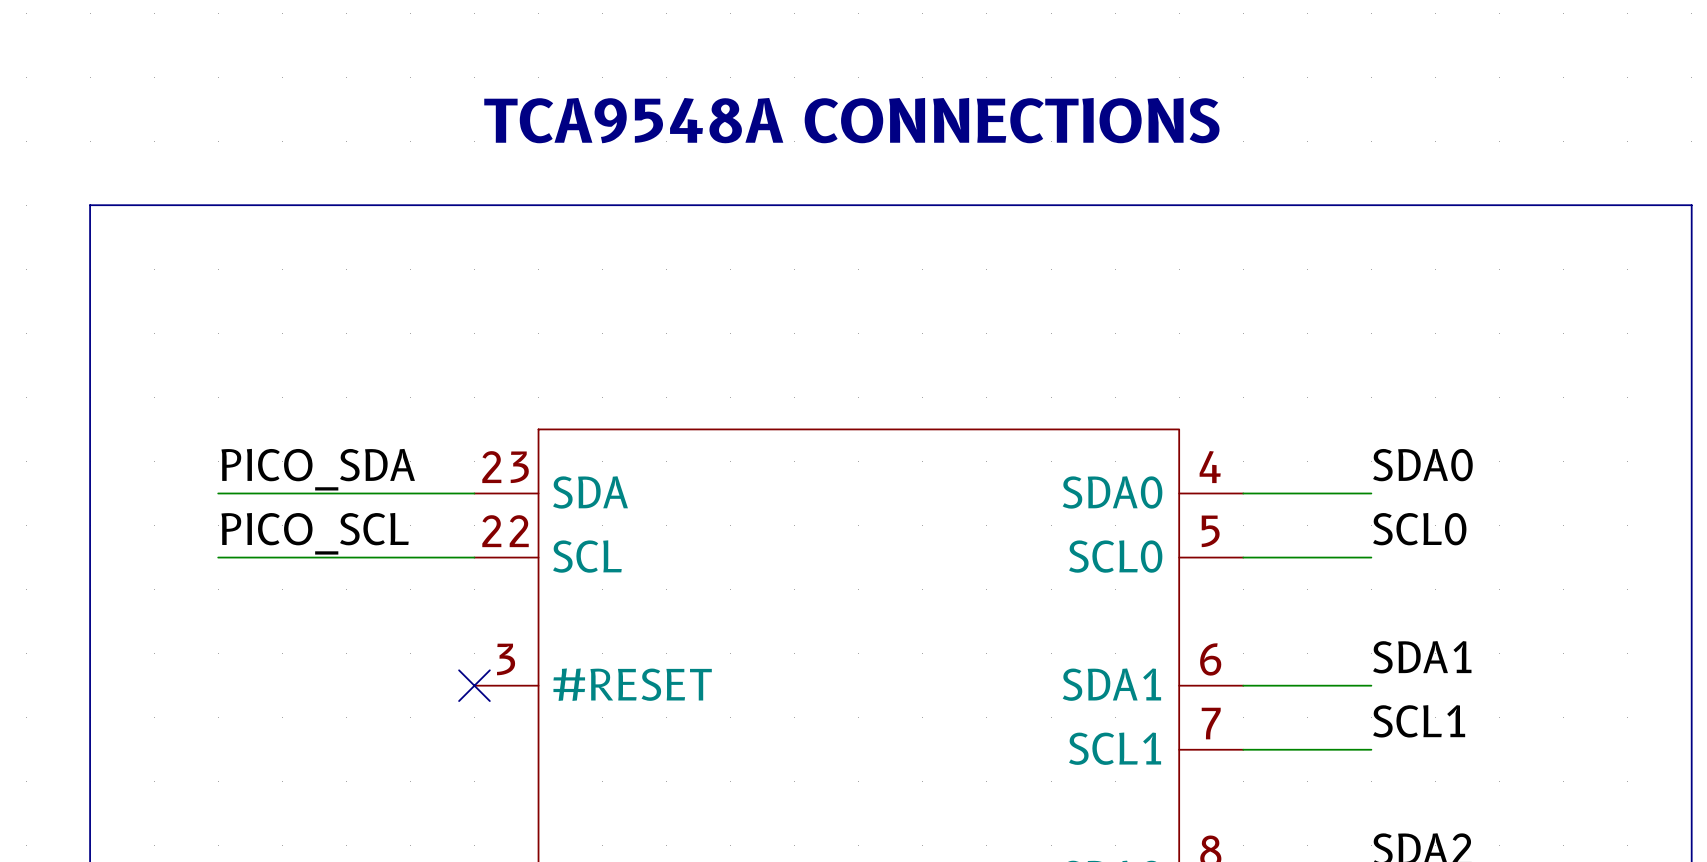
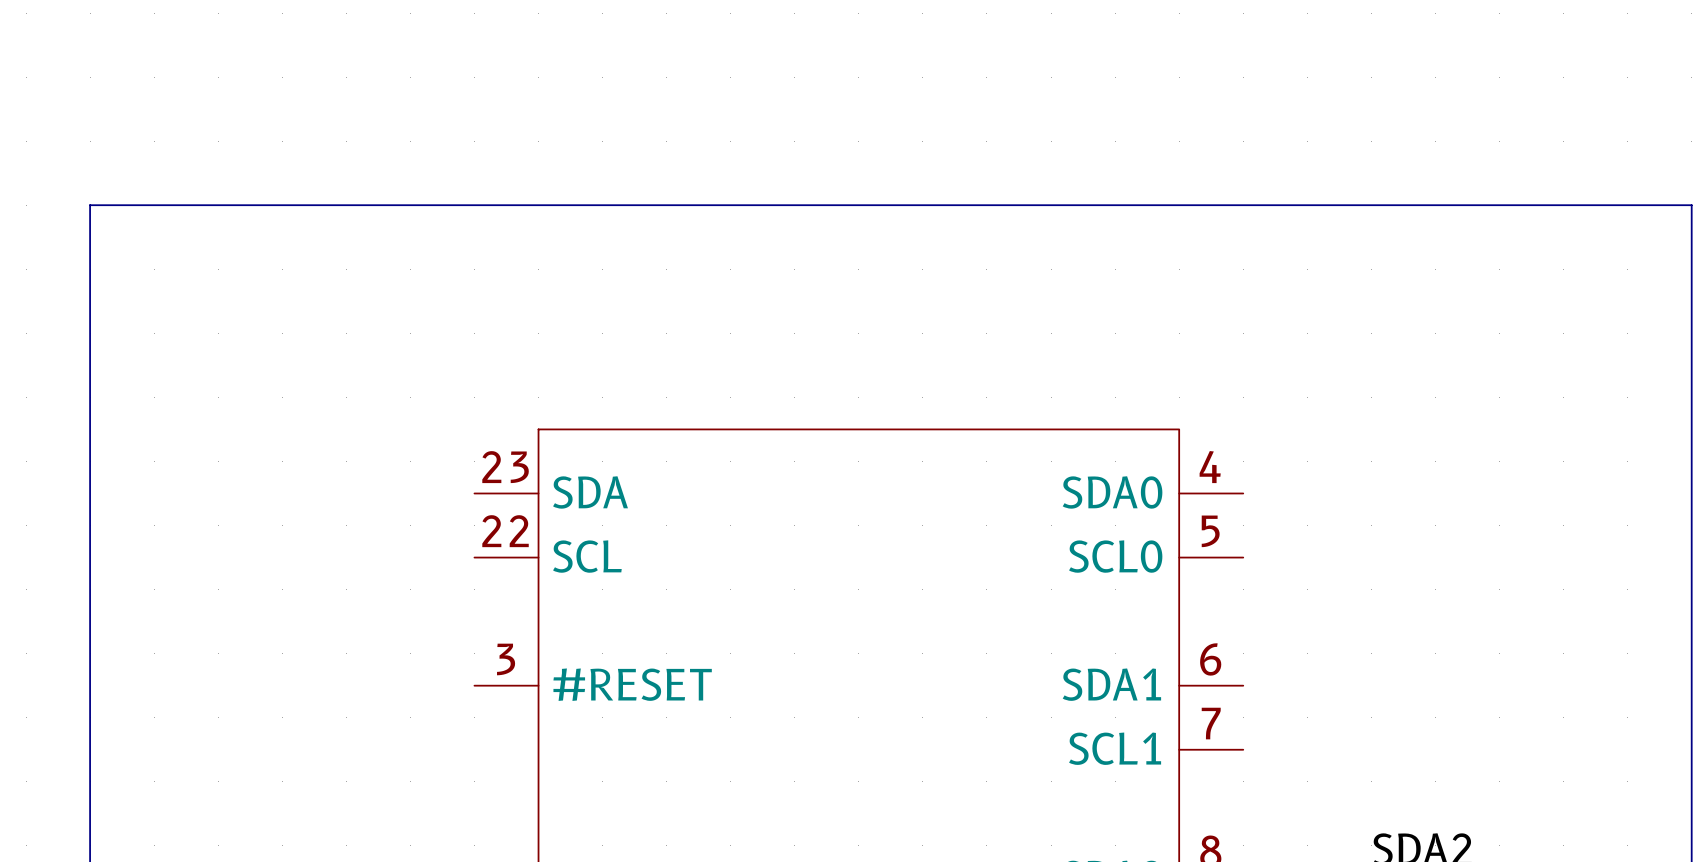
text: TCA9548A CONNECTIONS (851, 120) -> none
label: SDA0 (1422, 465) -> none
label: PICO_SDA (318, 469) -> none
wire: (218, 493) (474, 493) -> none
wire: (1243, 493) (1371, 493) -> none
label: SCL0 (1419, 529) -> none
label: PICO_SCL (315, 533) -> none
wire: (218, 557) (474, 557) -> none
wire: (1243, 557) (1371, 557) -> none
label: SDA1 (1422, 657) -> none
no-connect mark: (474, 685) -> none
wire: (1243, 685) (1371, 685) -> none
label: SCL1 (1419, 721) -> none
wire: (1243, 749) (1371, 749) -> none

